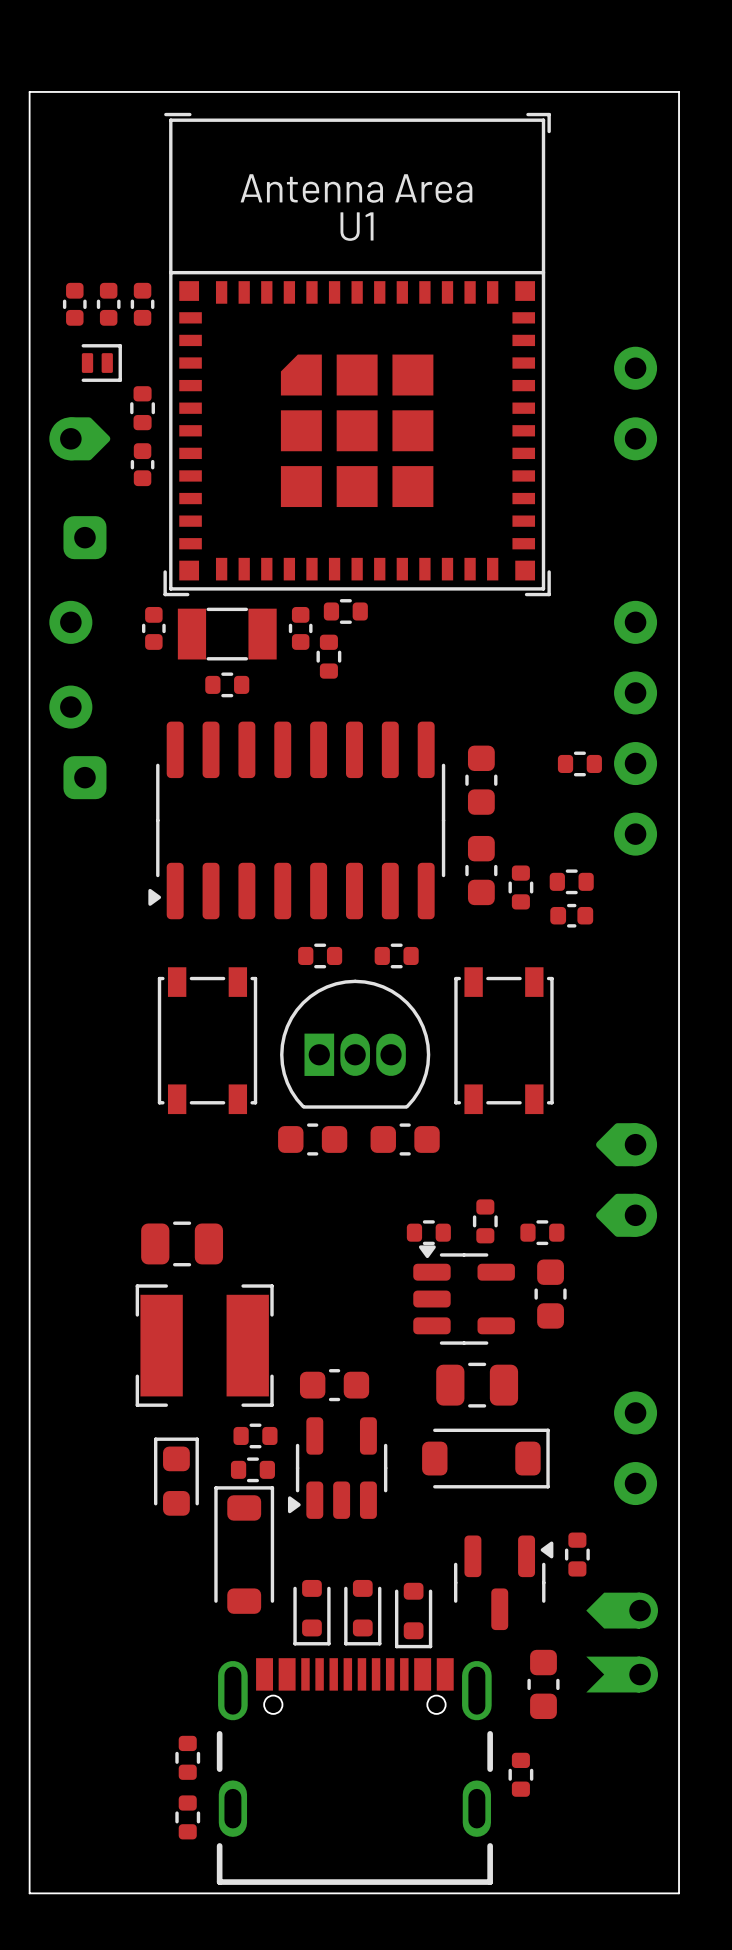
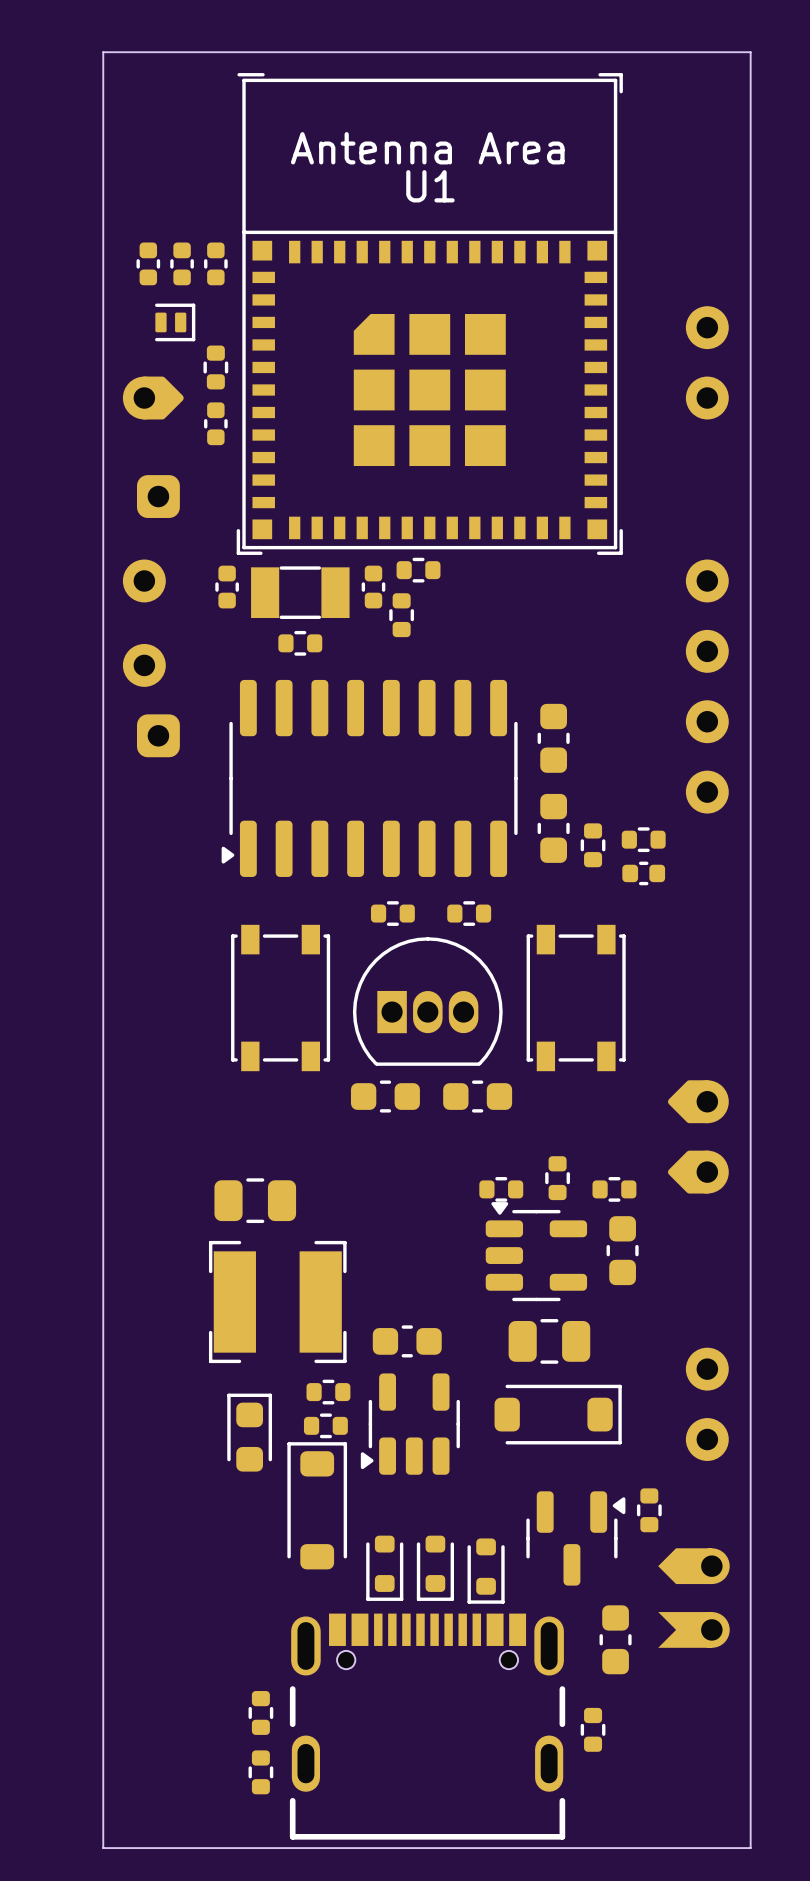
part: (579, 763) -> none

